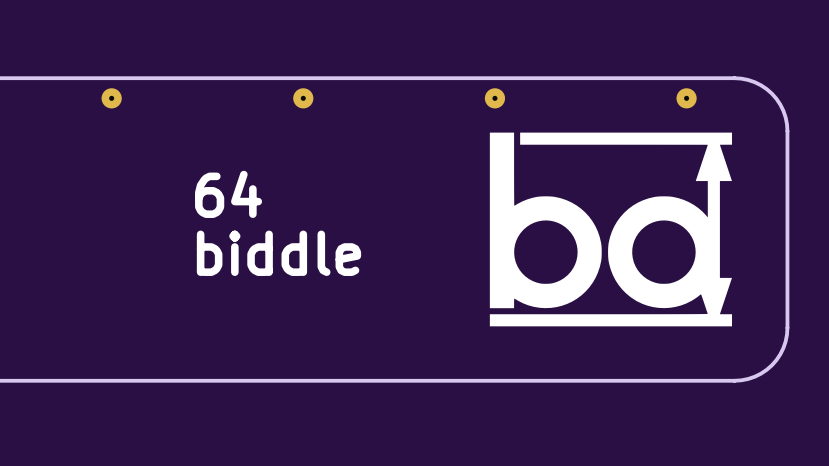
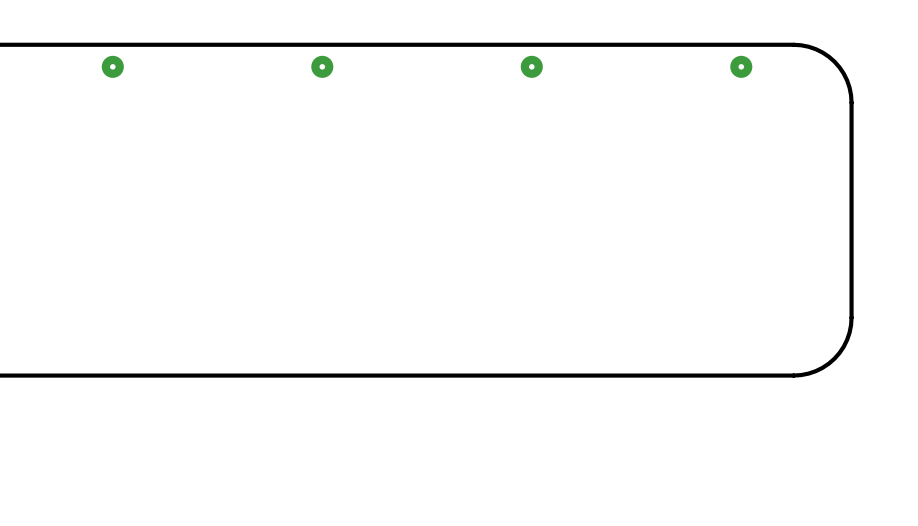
drawing: [489, 132, 733, 327] -> none
text: 64 (228, 194) -> none
text: biddle (278, 253) -> none

